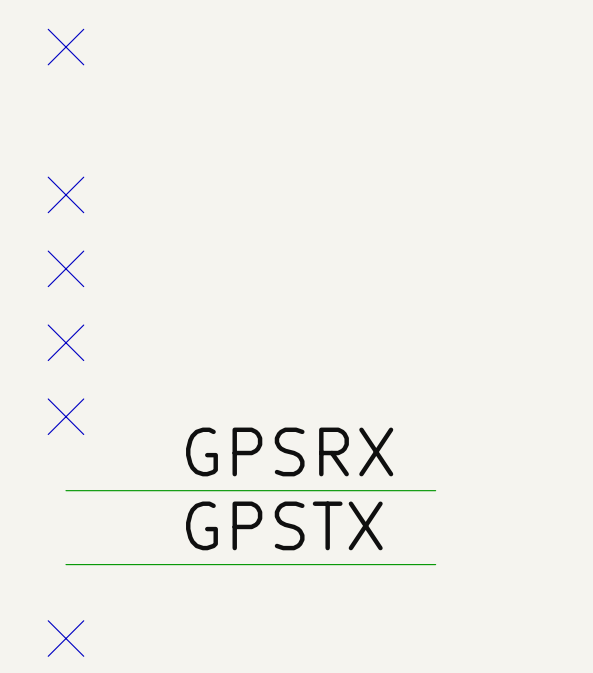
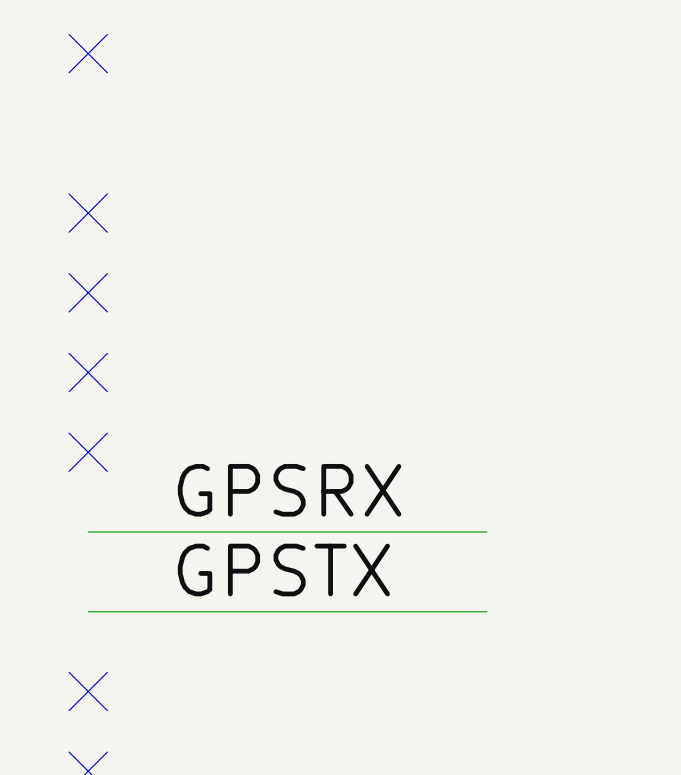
label position: GPSRX (289, 451) -> GPSRX (289, 490)
label position: GPSTX (284, 525) -> GPSTX (283, 570)

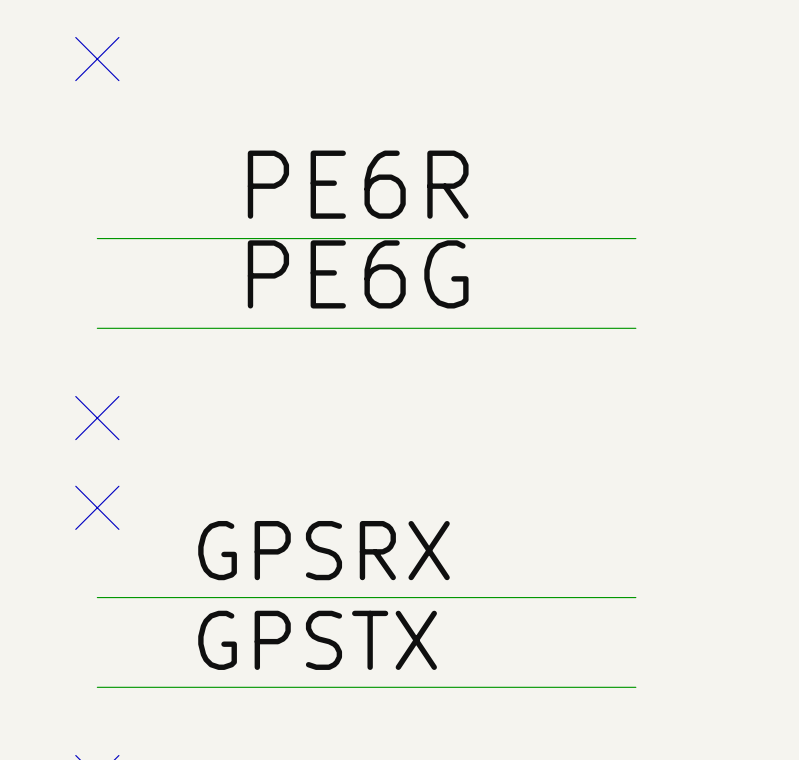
label: none -> PE6R (358, 184)
wire: none -> (97, 238) (635, 238)
no-connect mark: (88, 213) -> none
label: none -> PE6G (358, 274)
wire: none -> (97, 328) (635, 328)
no-connect mark: (88, 292) -> none
wire: none -> (546, 597) (635, 597)
wire: none -> (546, 687) (635, 687)

